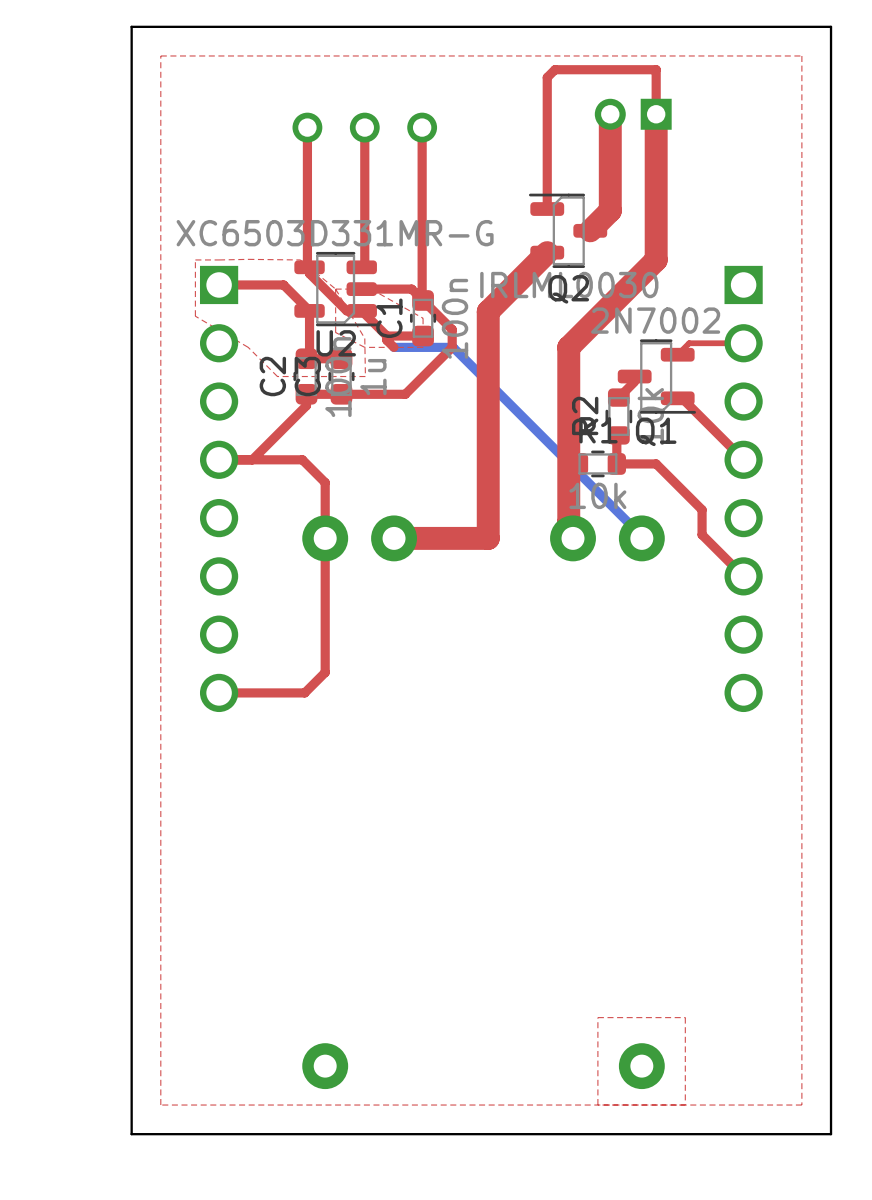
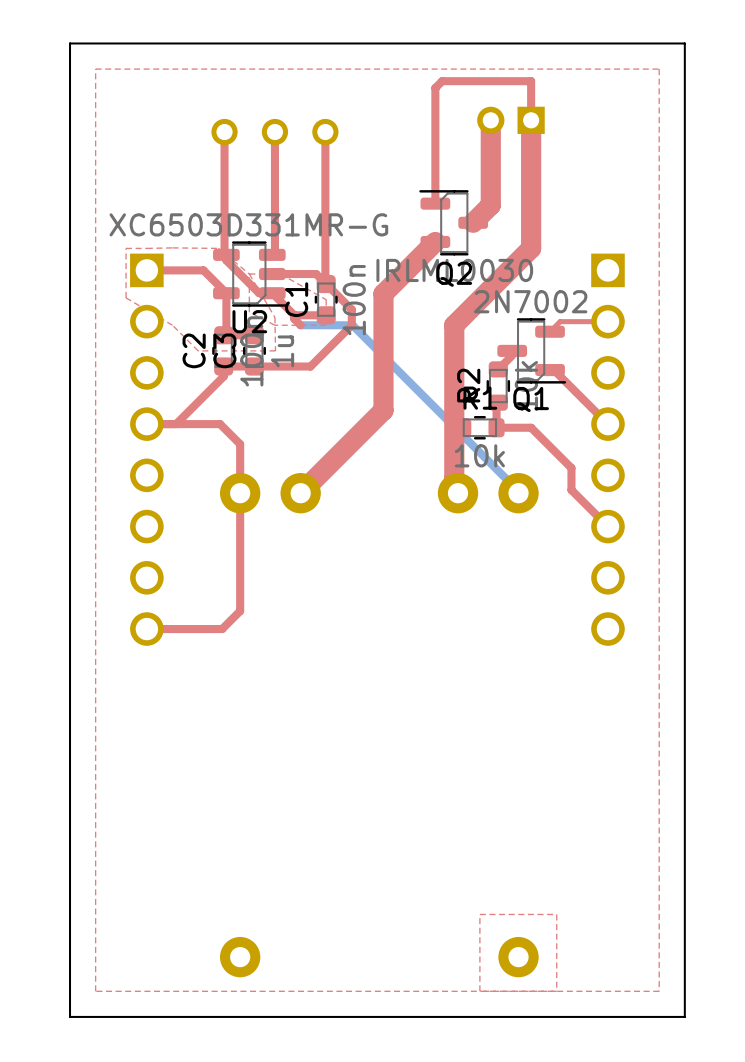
top track: (488, 444) (488, 538) (394, 538) -> (383, 410) (300, 493)

